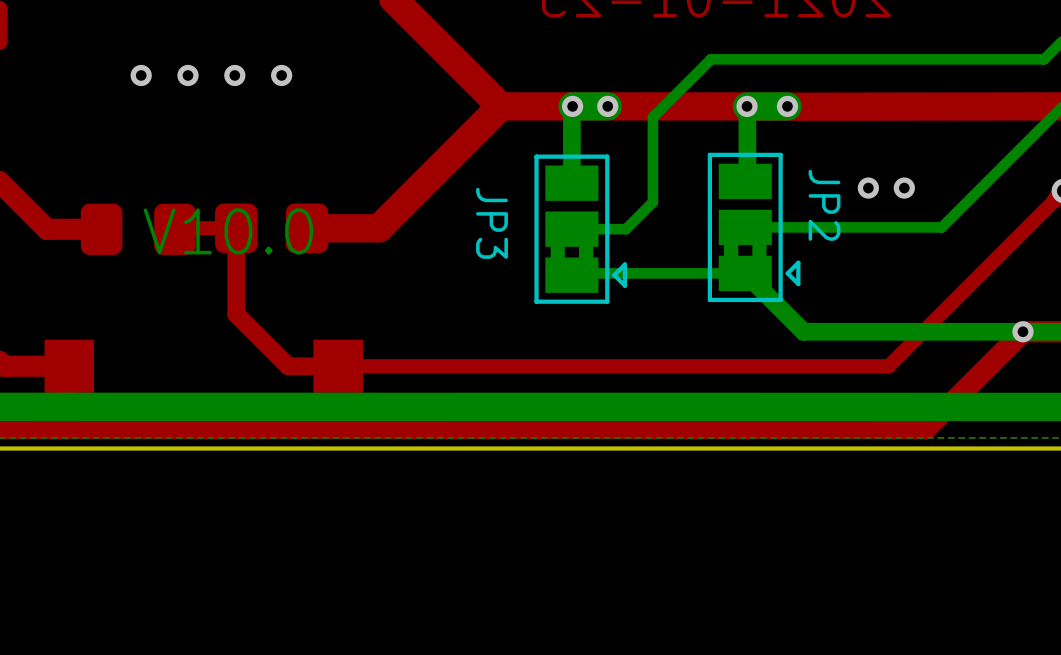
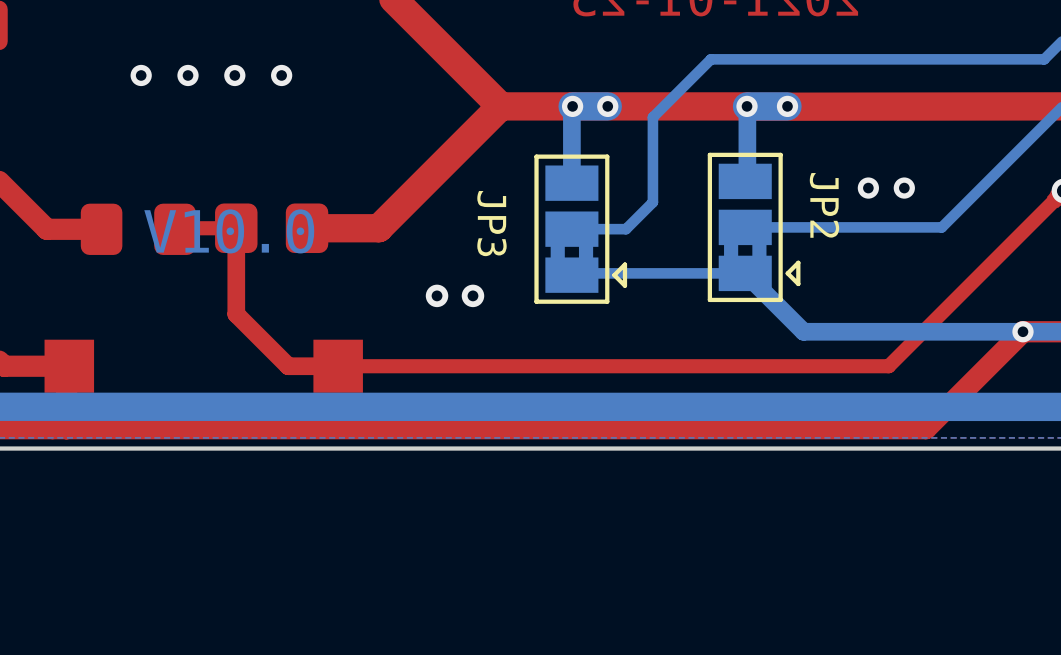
via: none -> (437, 295)
via: none -> (472, 295)

